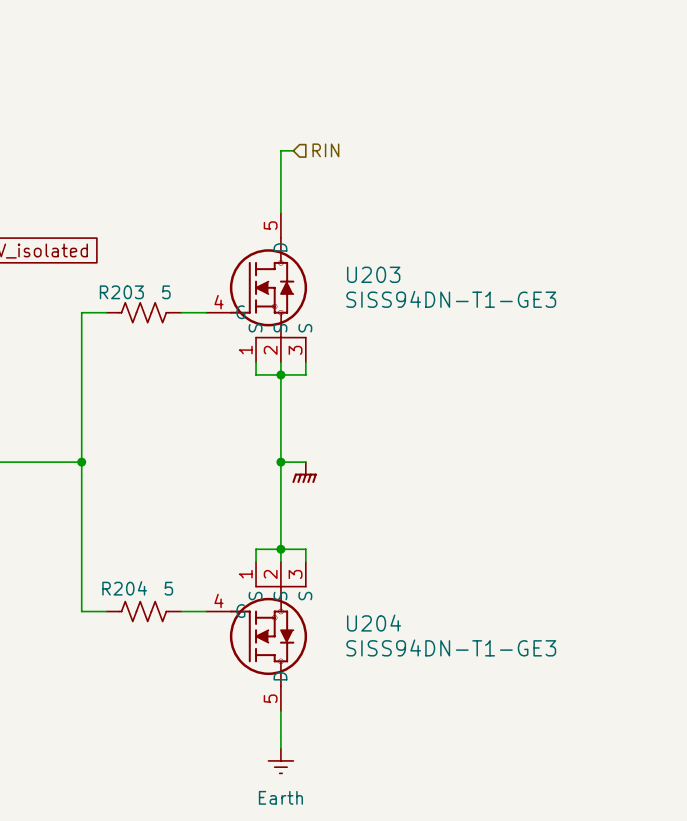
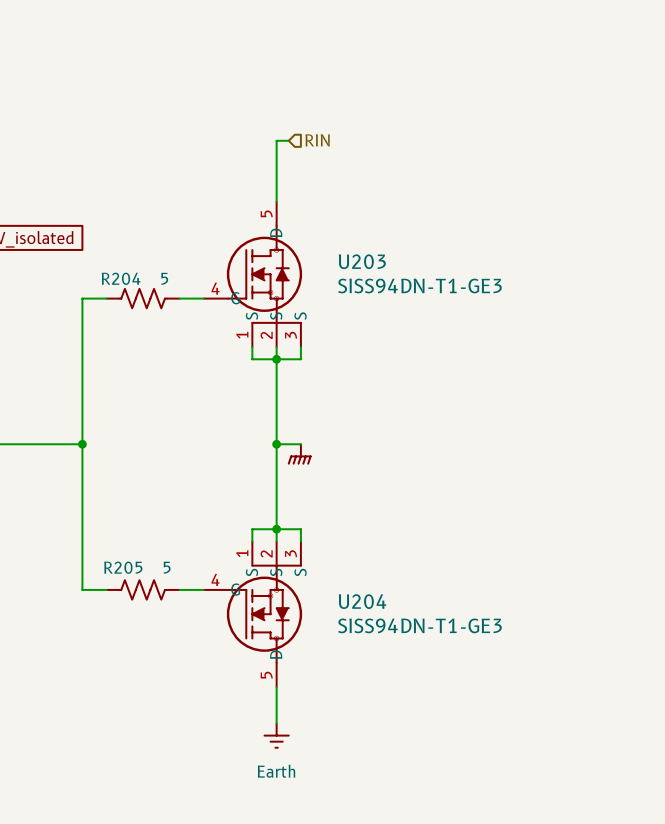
R203 name: R203 (121, 292) -> R204 (121, 278)
R204 name: R204 (124, 588) -> R205 (123, 567)

